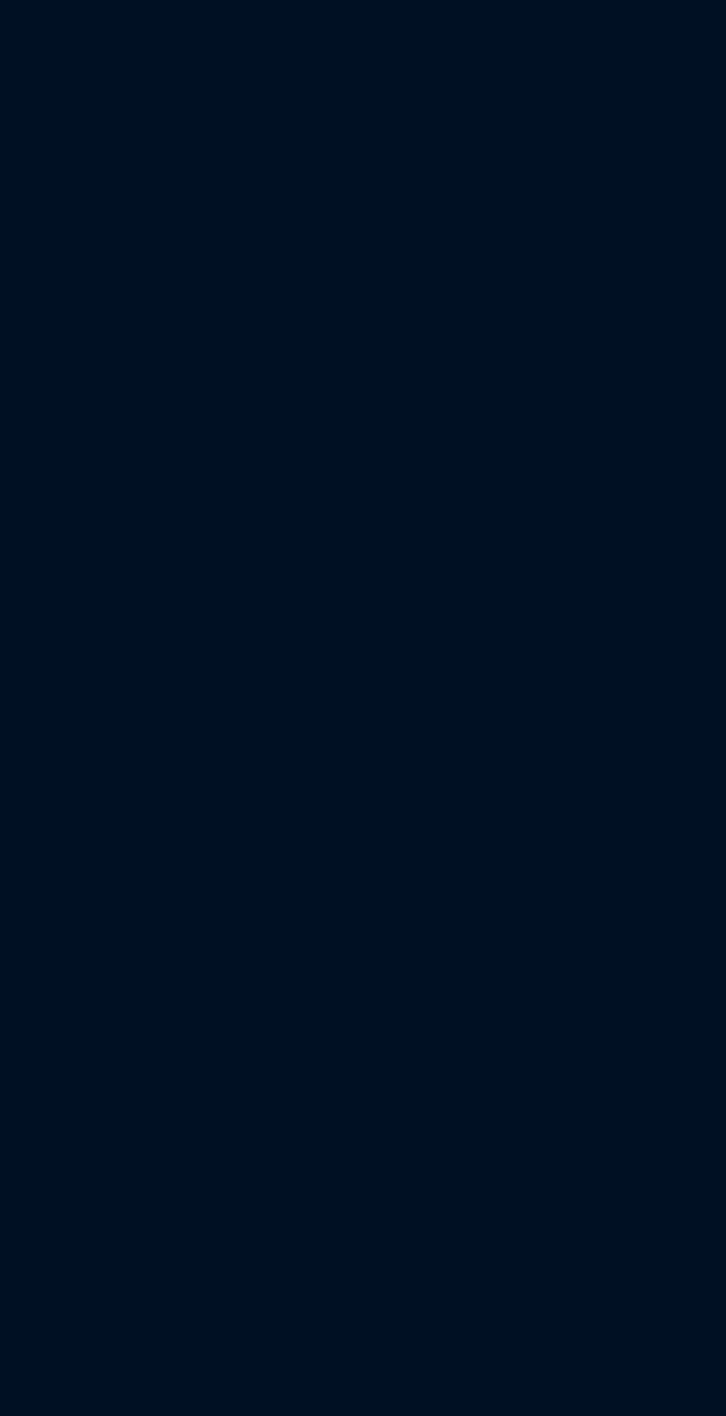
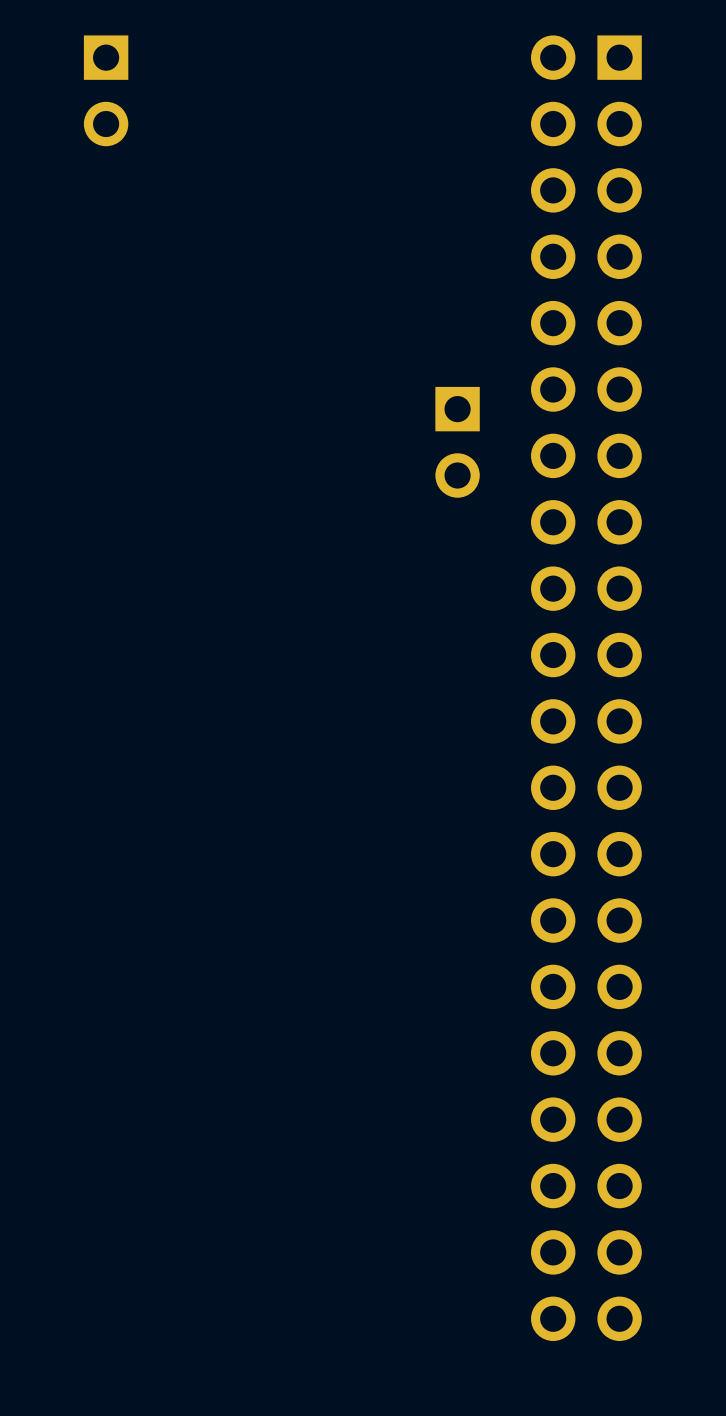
part: none -> (106, 90)
part: none -> (457, 442)
part: none -> (586, 688)

